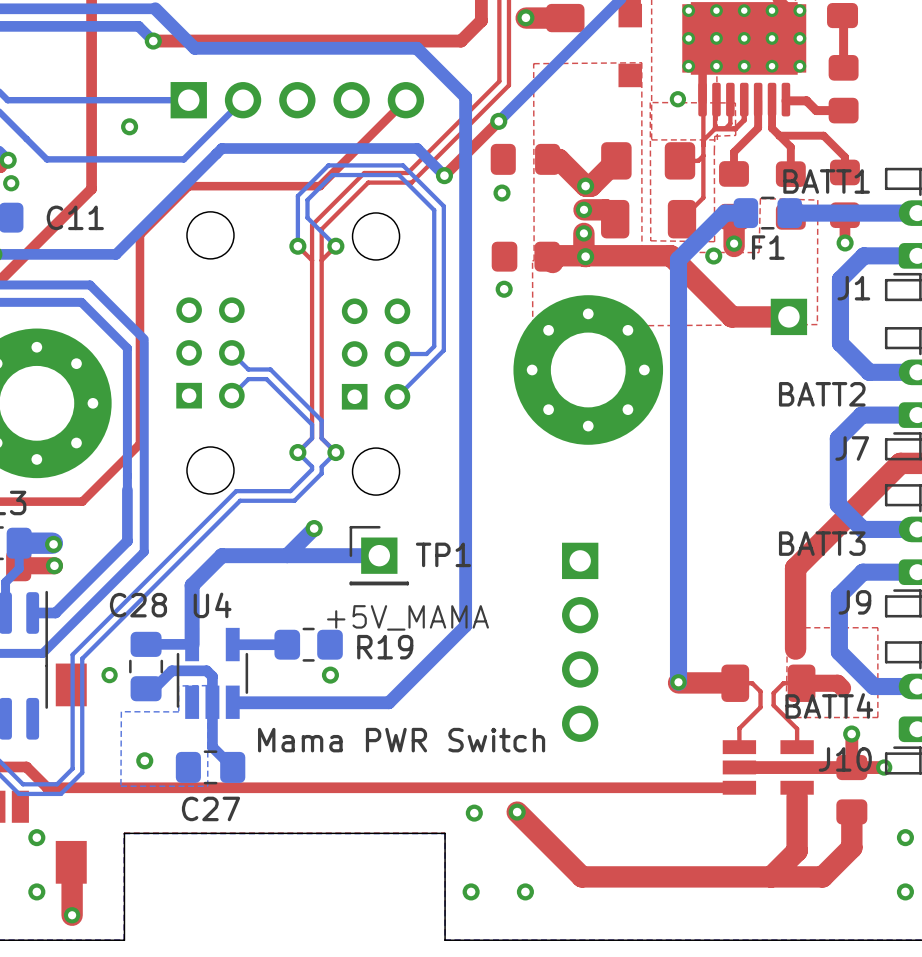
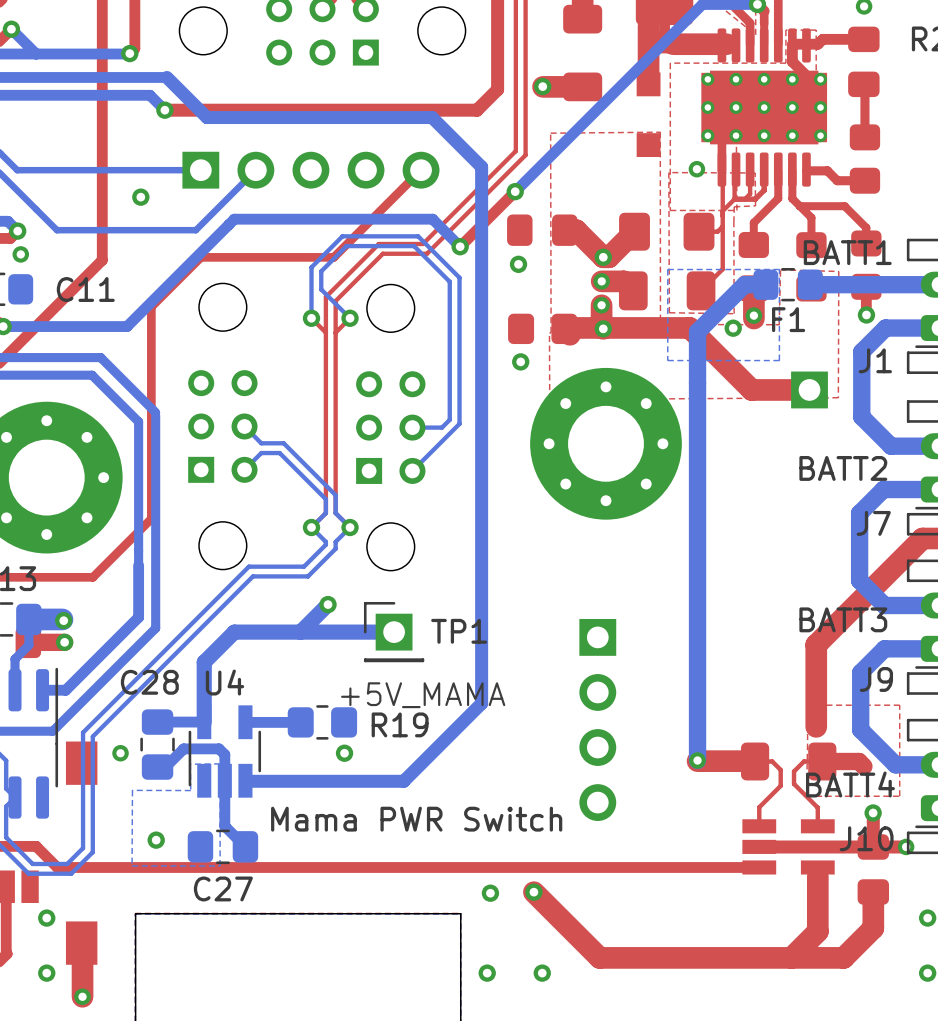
bottom zone outline: none -> (779, 269) (779, 360) (667, 360) (667, 269) (779, 269)

